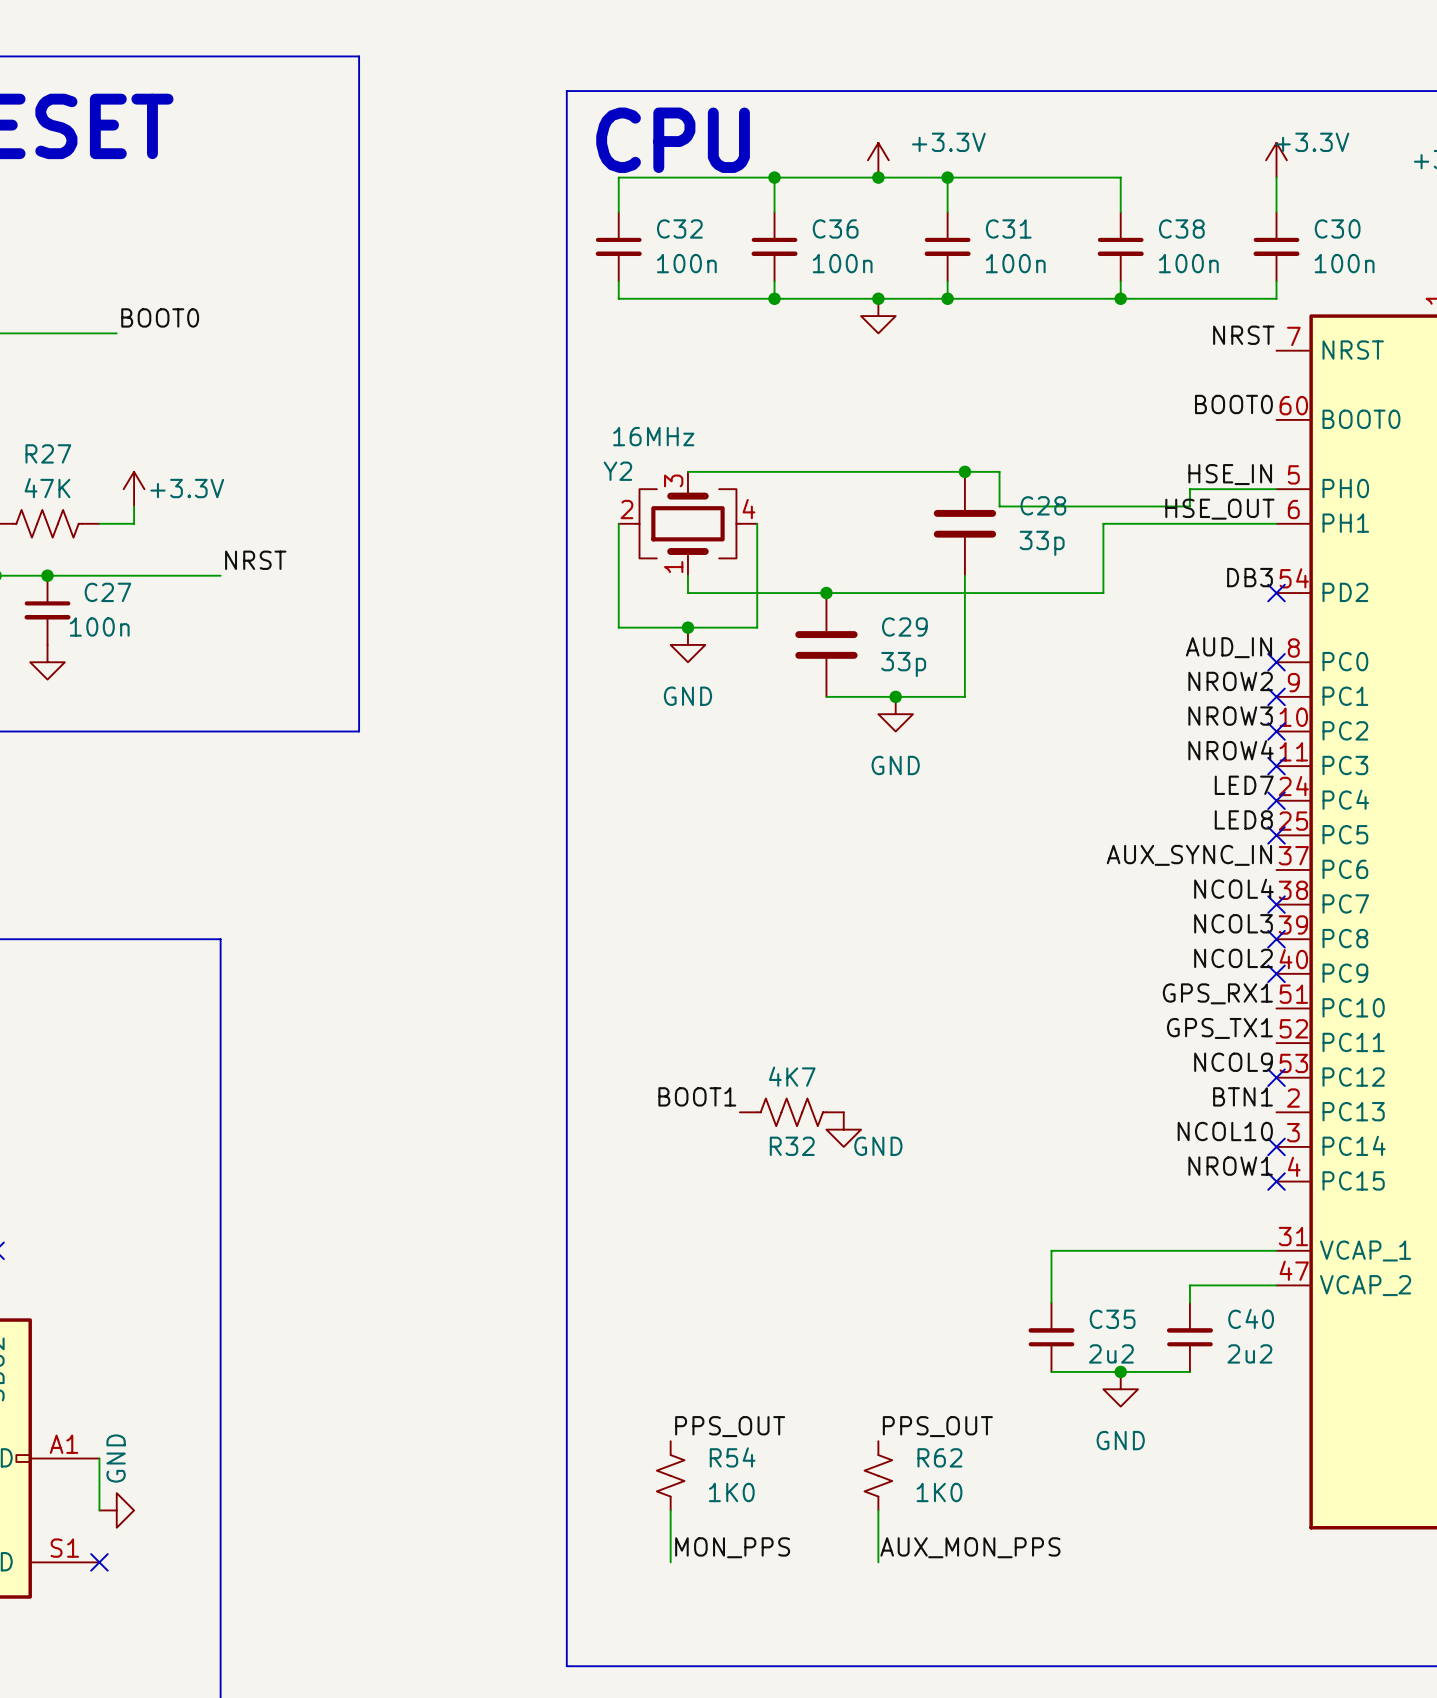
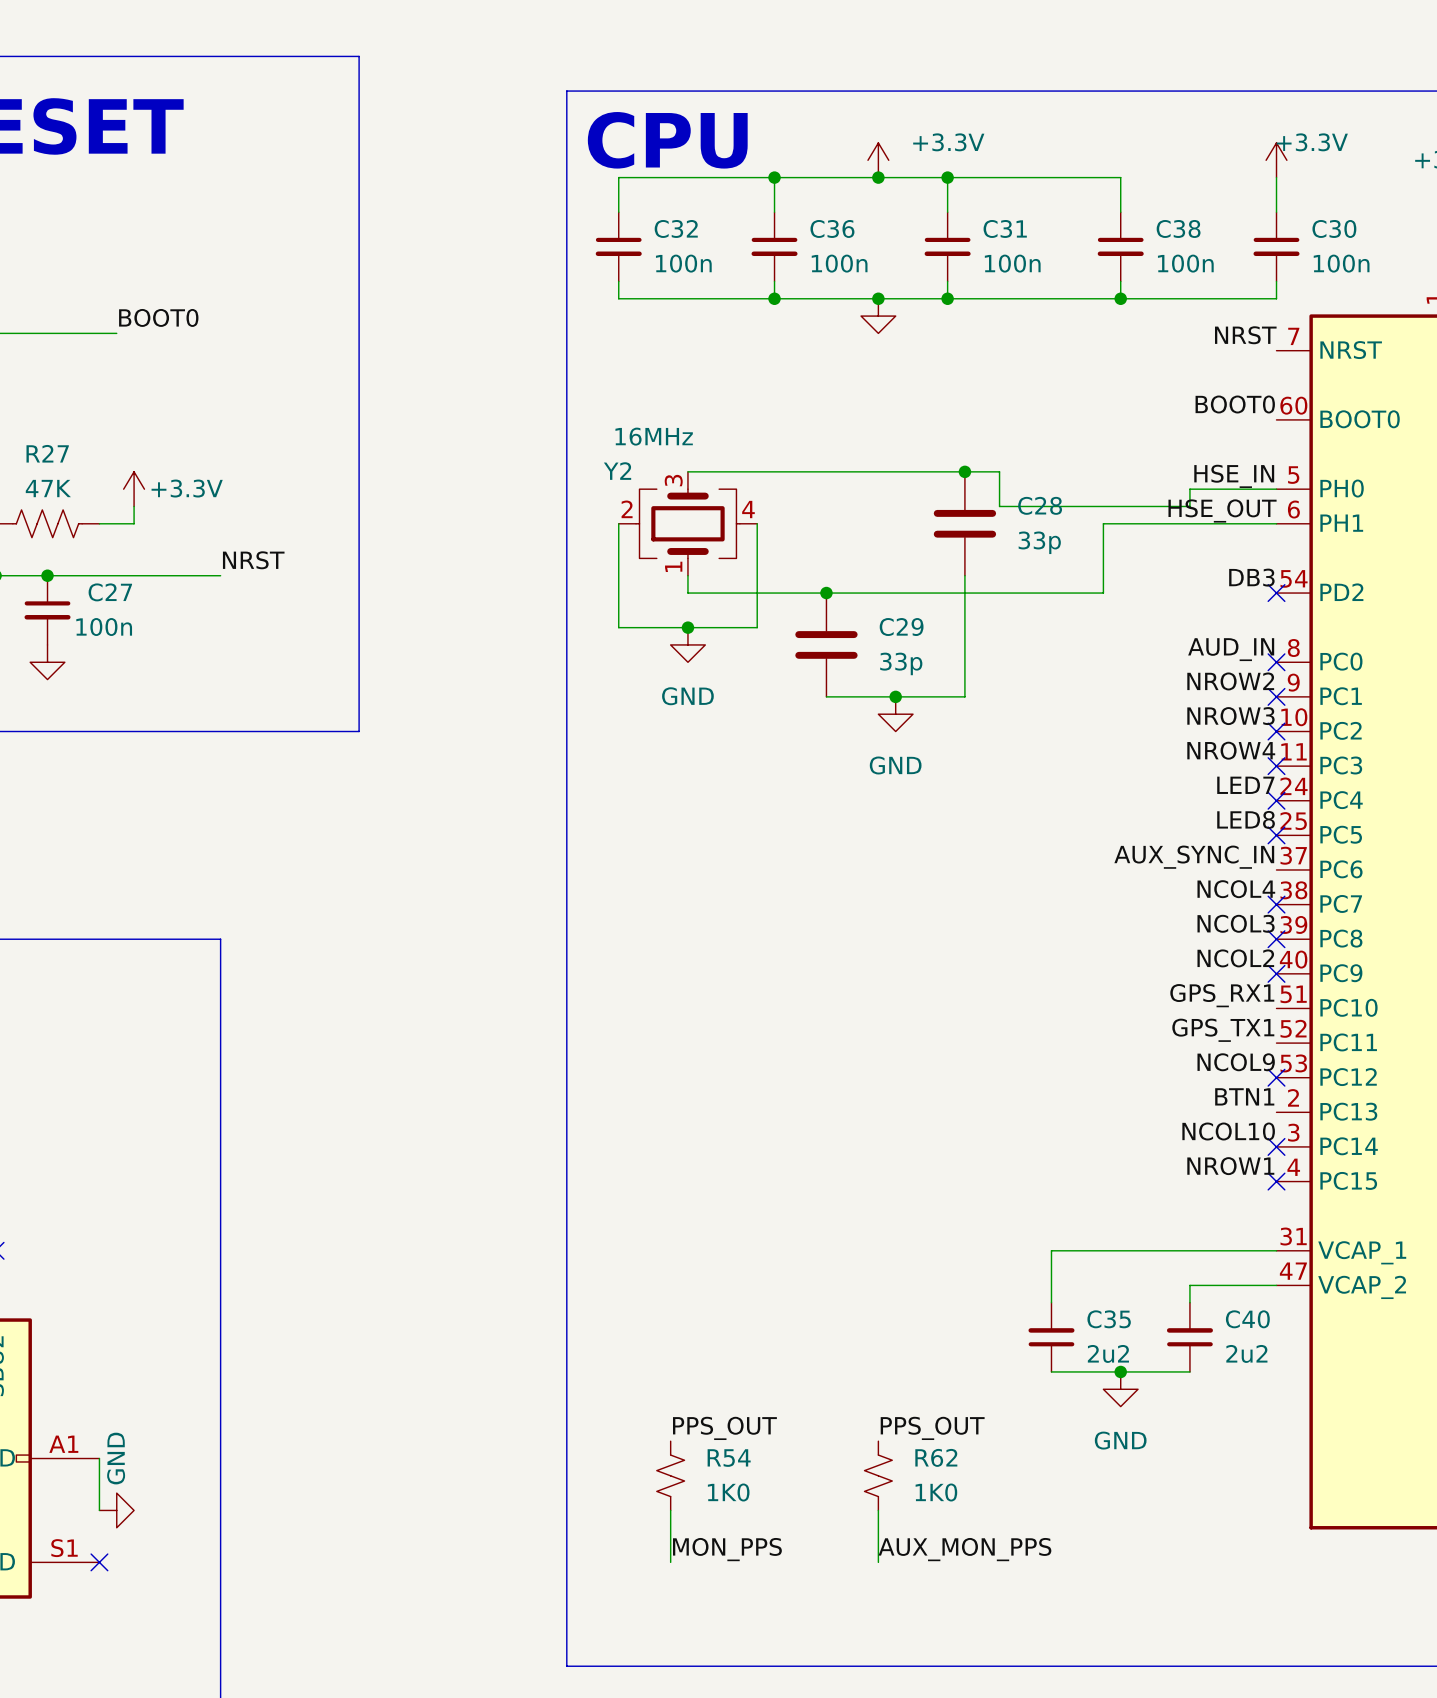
label: BOOT1 (697, 1096) -> none
R32: 4K7 (791, 1112) -> none
power symbol: GND (843, 1129) -> none

